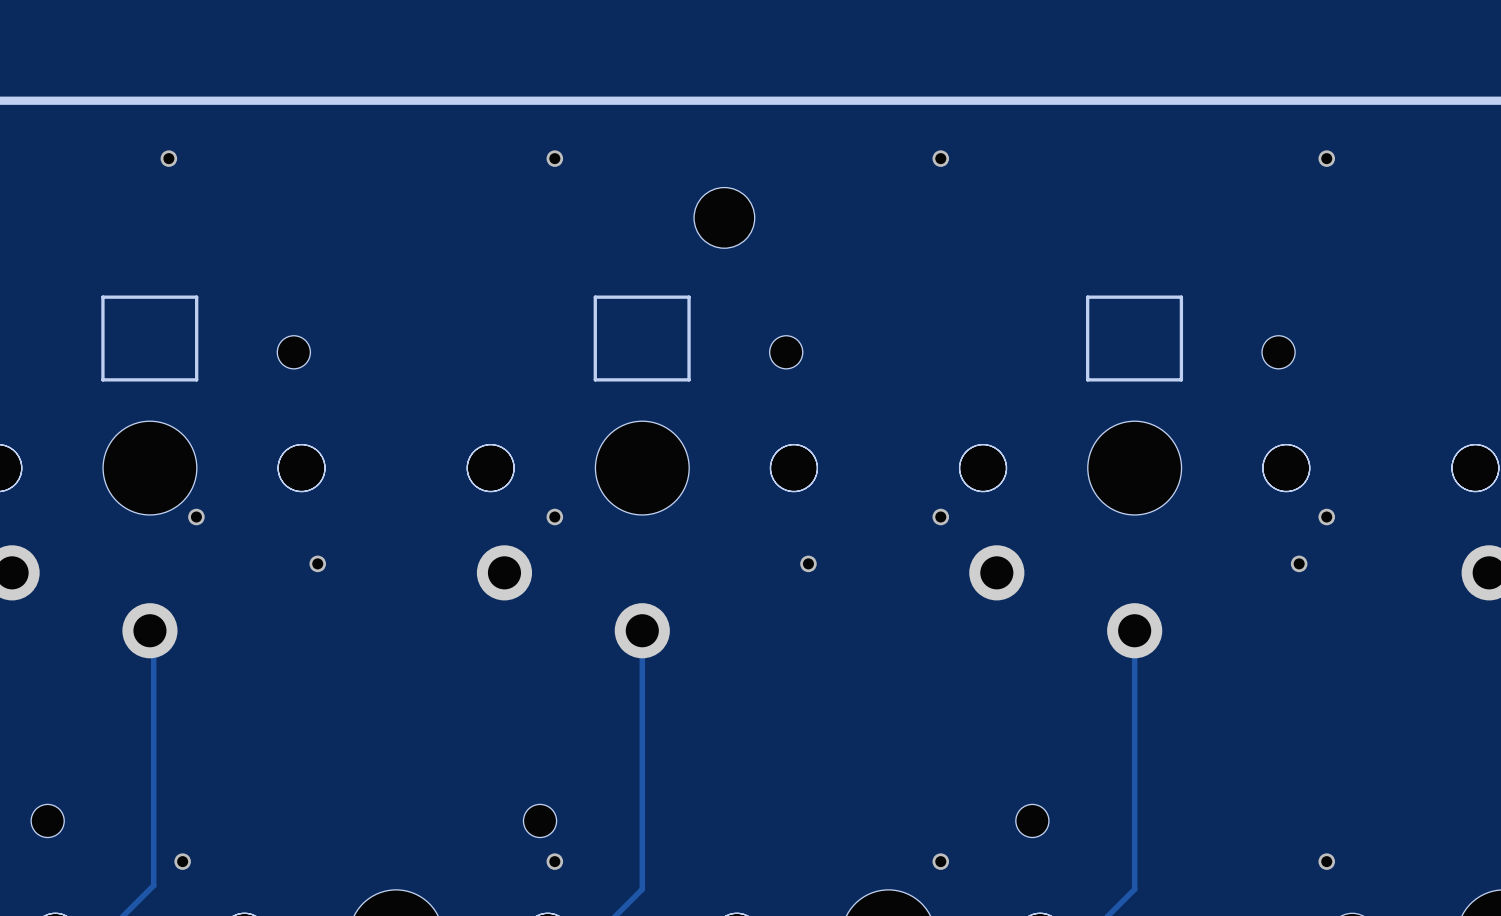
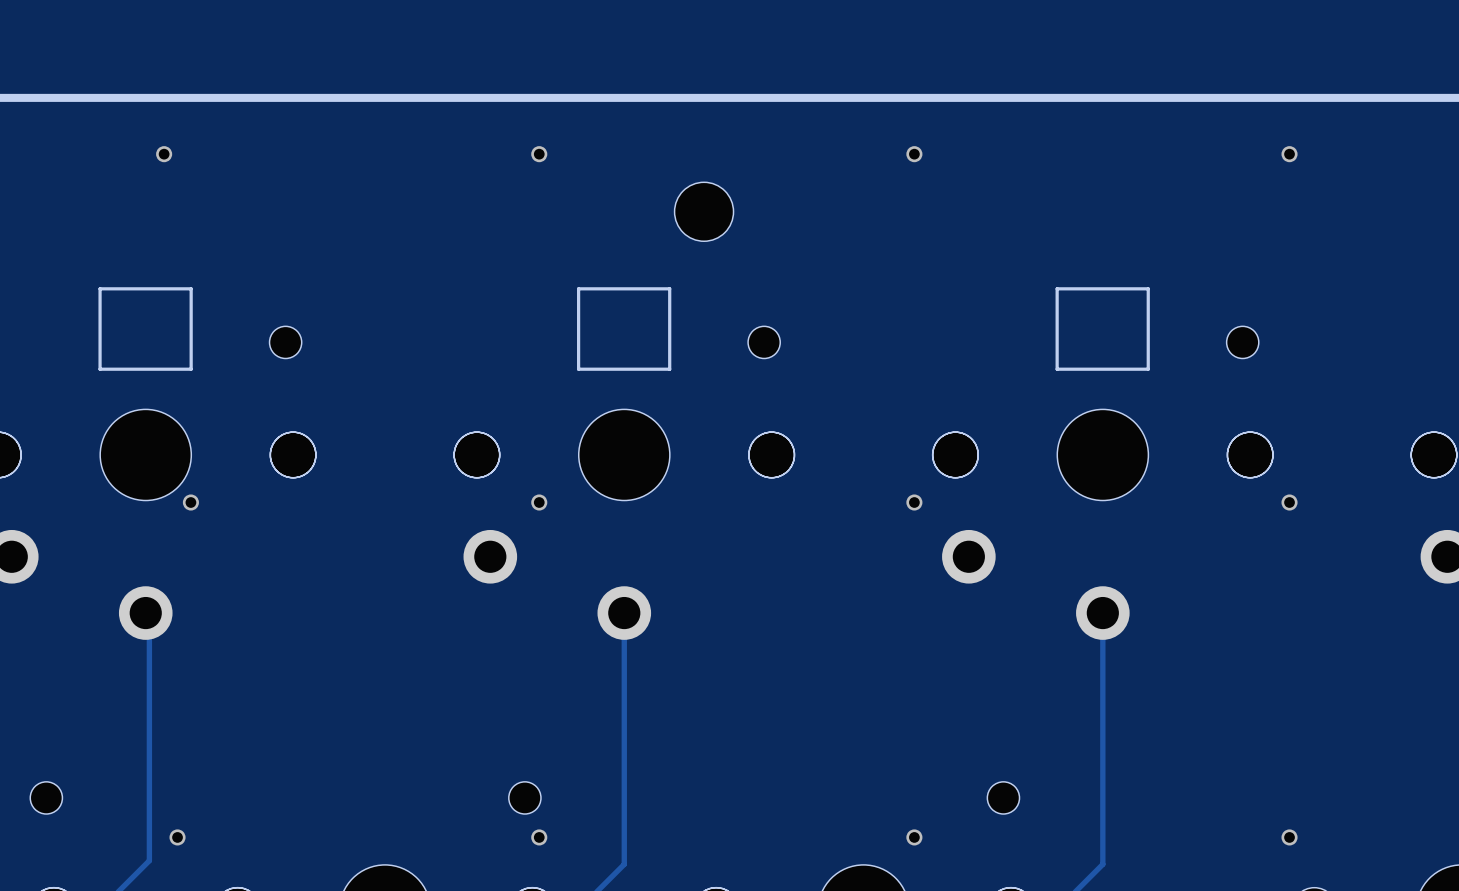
via: (317, 563) -> none
via: (808, 563) -> none
via: (1299, 563) -> none

